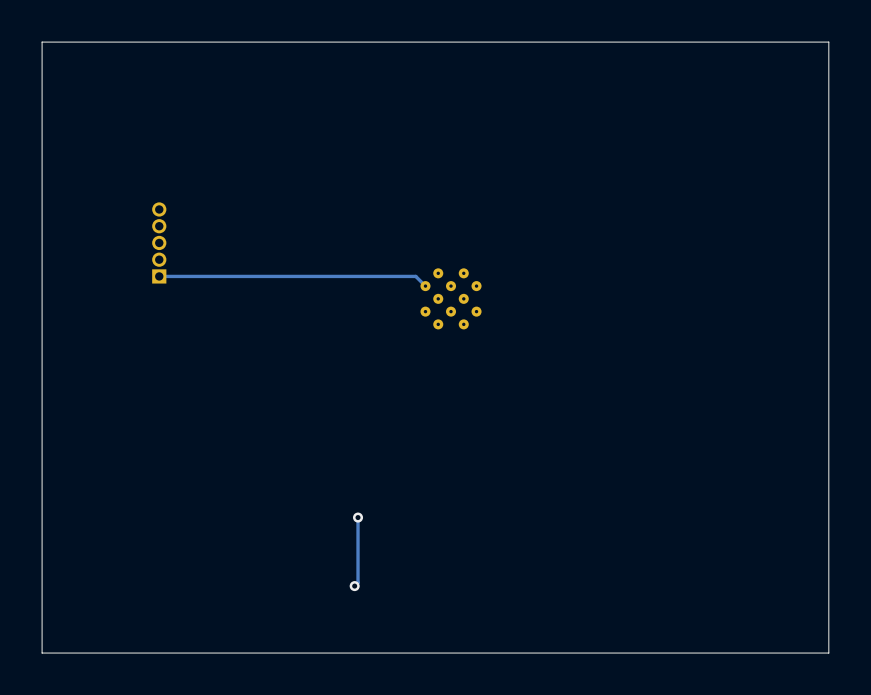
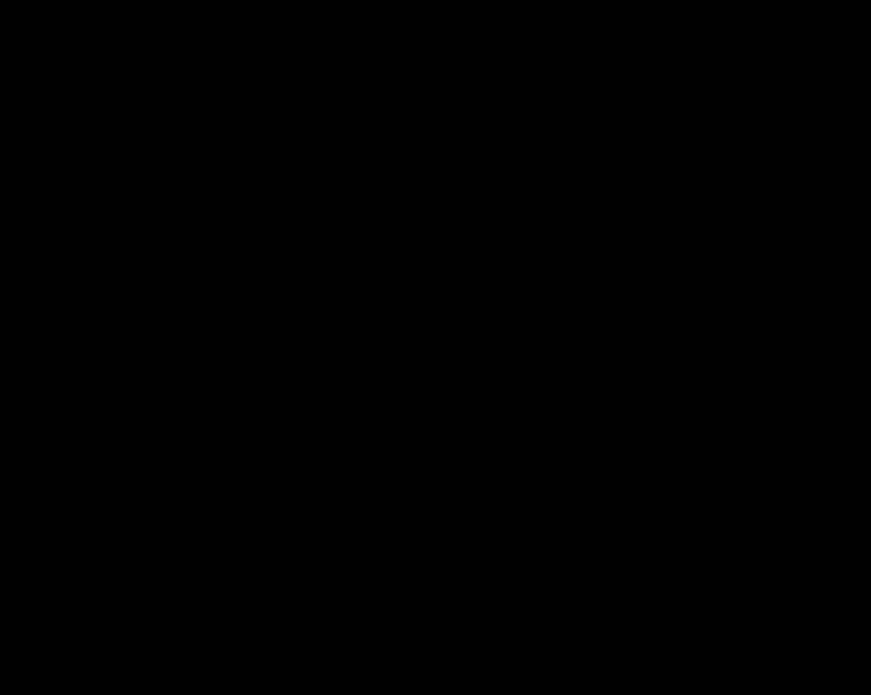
board edge: (828, 42) (42, 42) (42, 653) (828, 653) (828, 42) -> none
part: (159, 242) -> none
track: (159, 276) (415, 276) (425, 286) -> none
part: (451, 298) -> none
track: (358, 517) (358, 582) (354, 586) -> none
via: (358, 517) -> none
via: (354, 586) -> none

